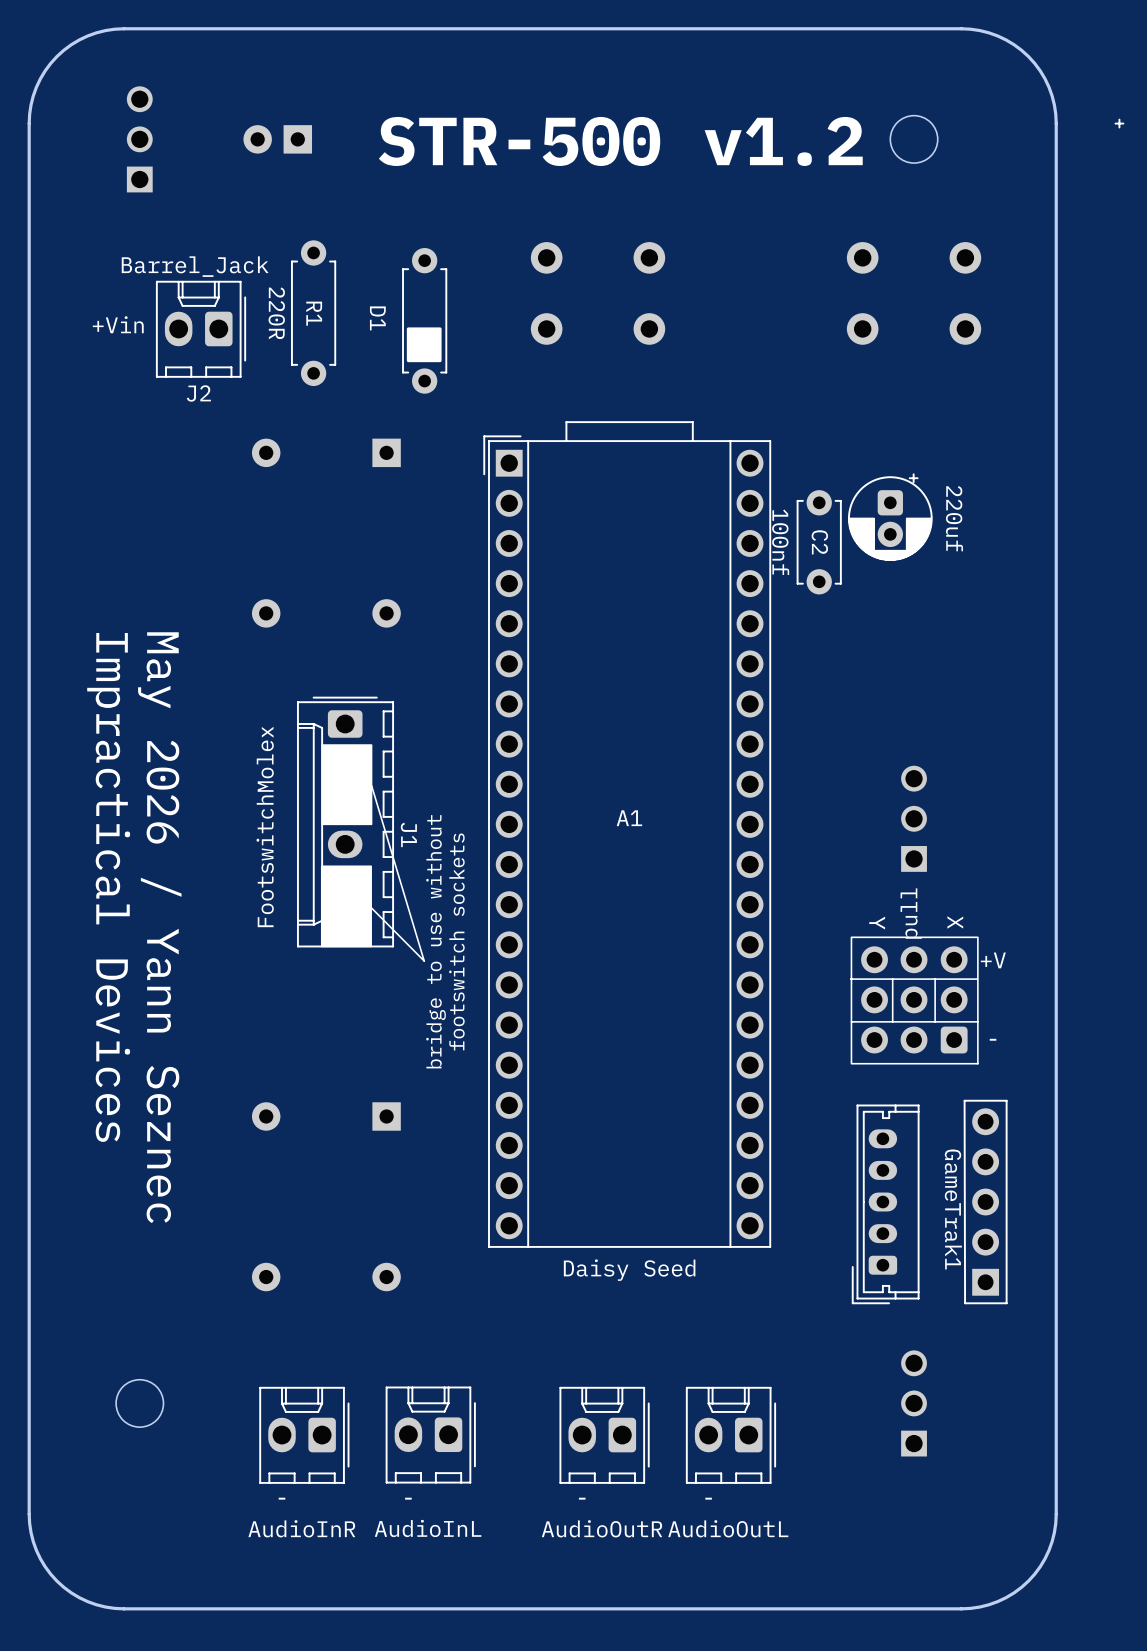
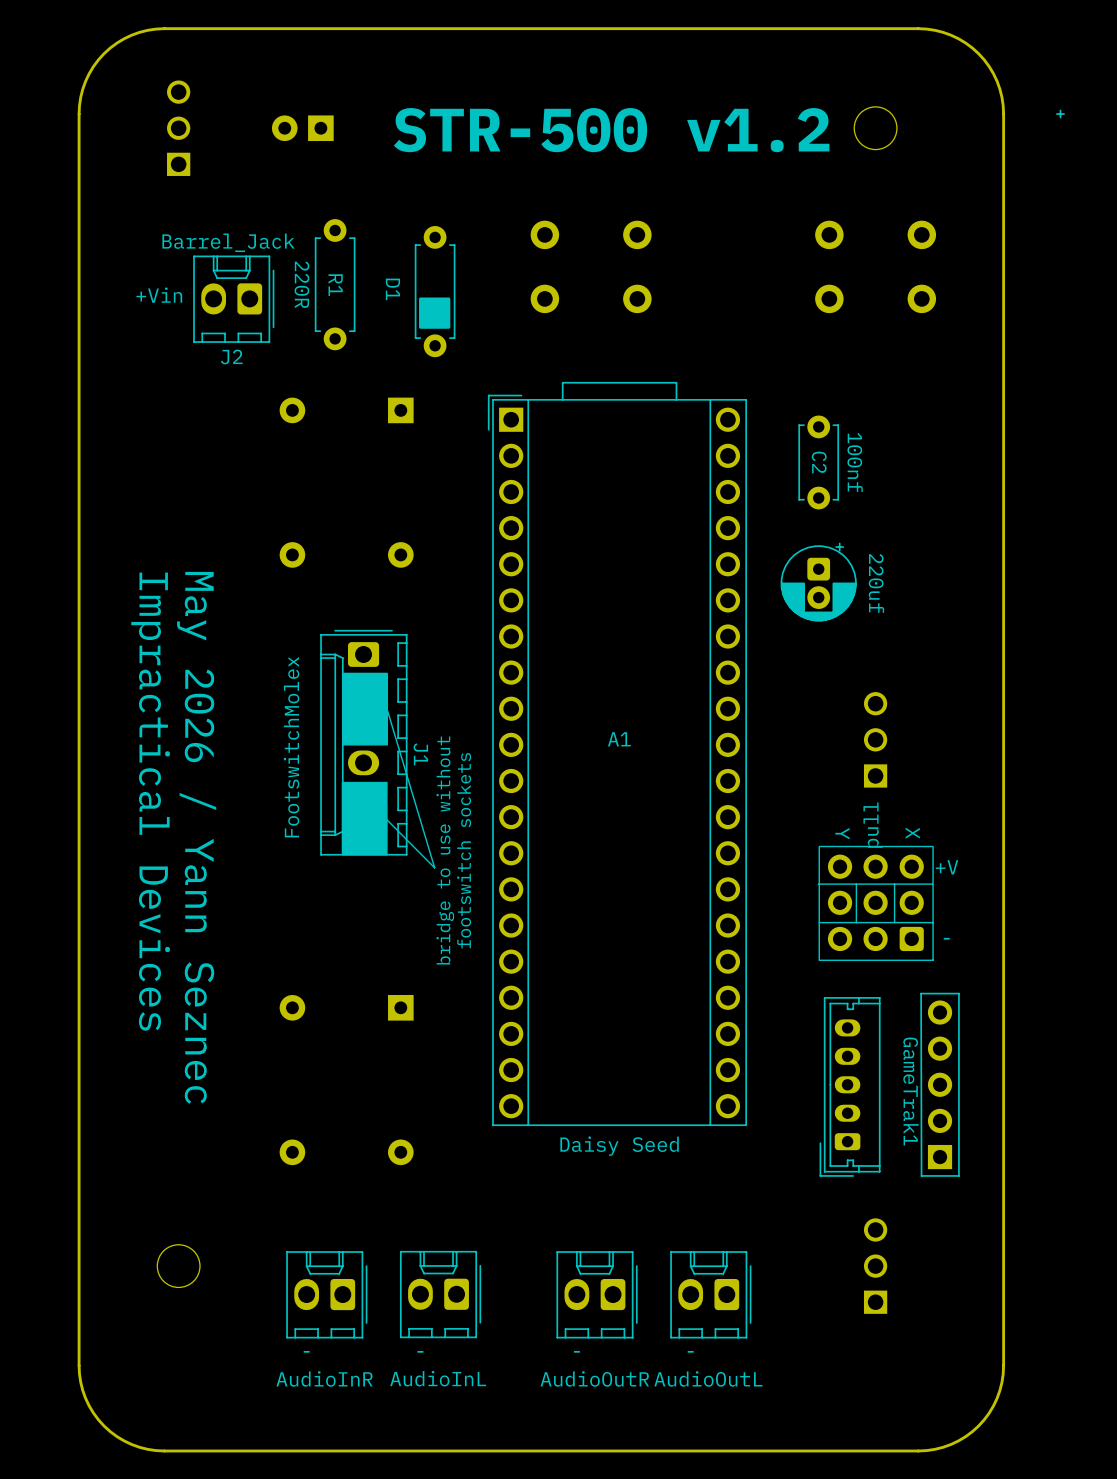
part position: (890, 517) -> (818, 582)
C2 value position: 100nf (780, 542) -> 100nf (855, 462)
C2 position: (819, 542) -> (818, 462)

